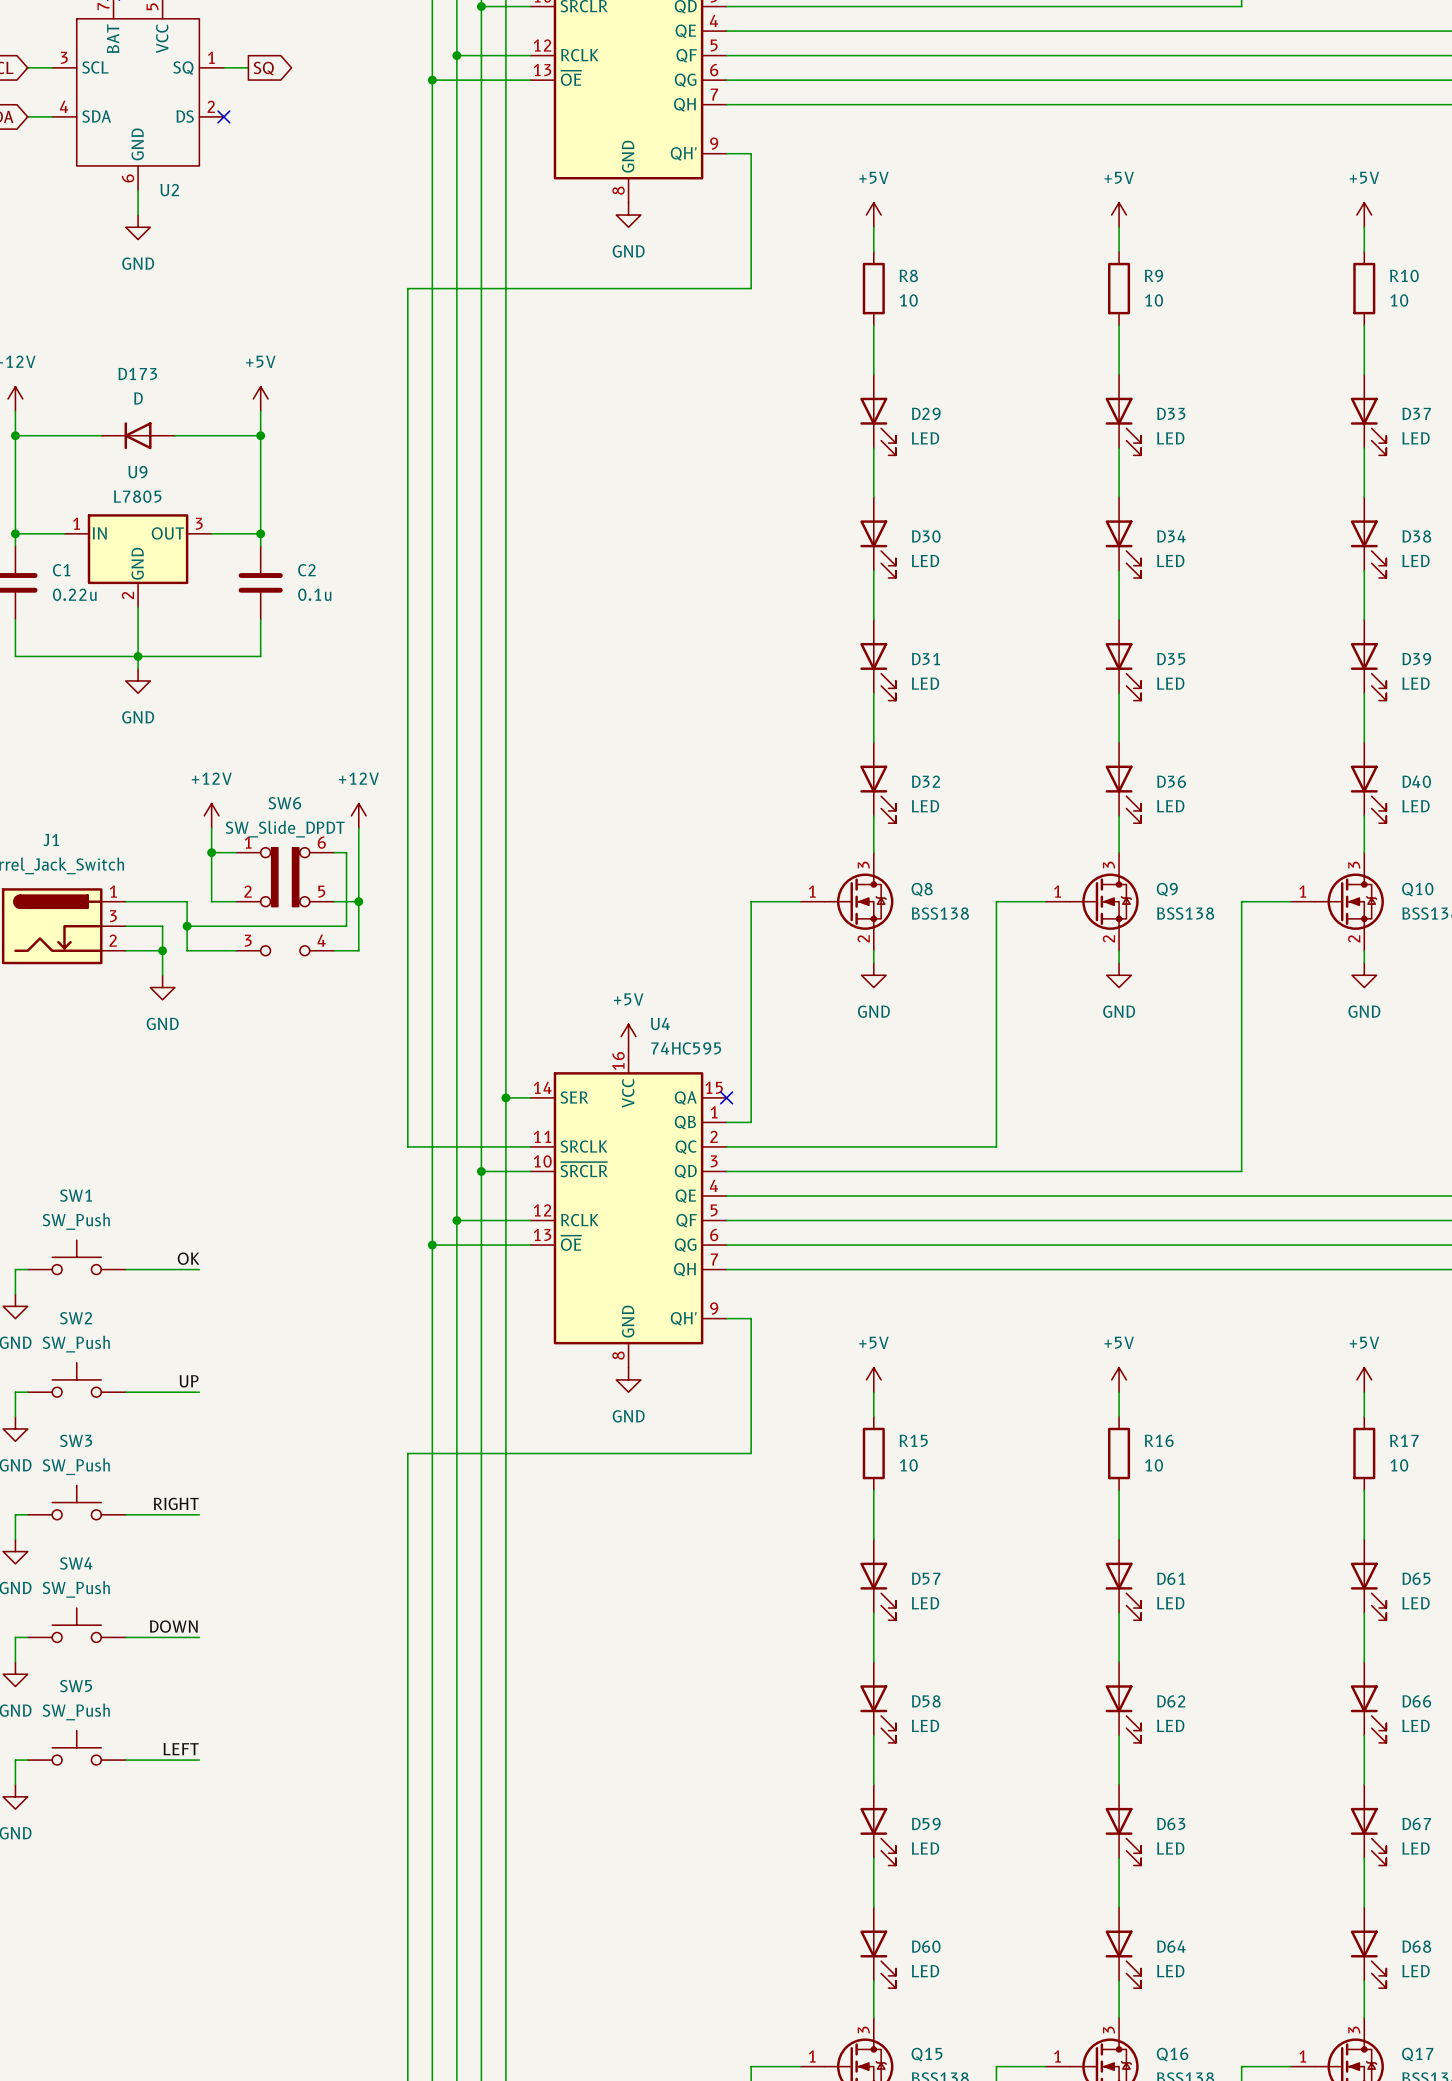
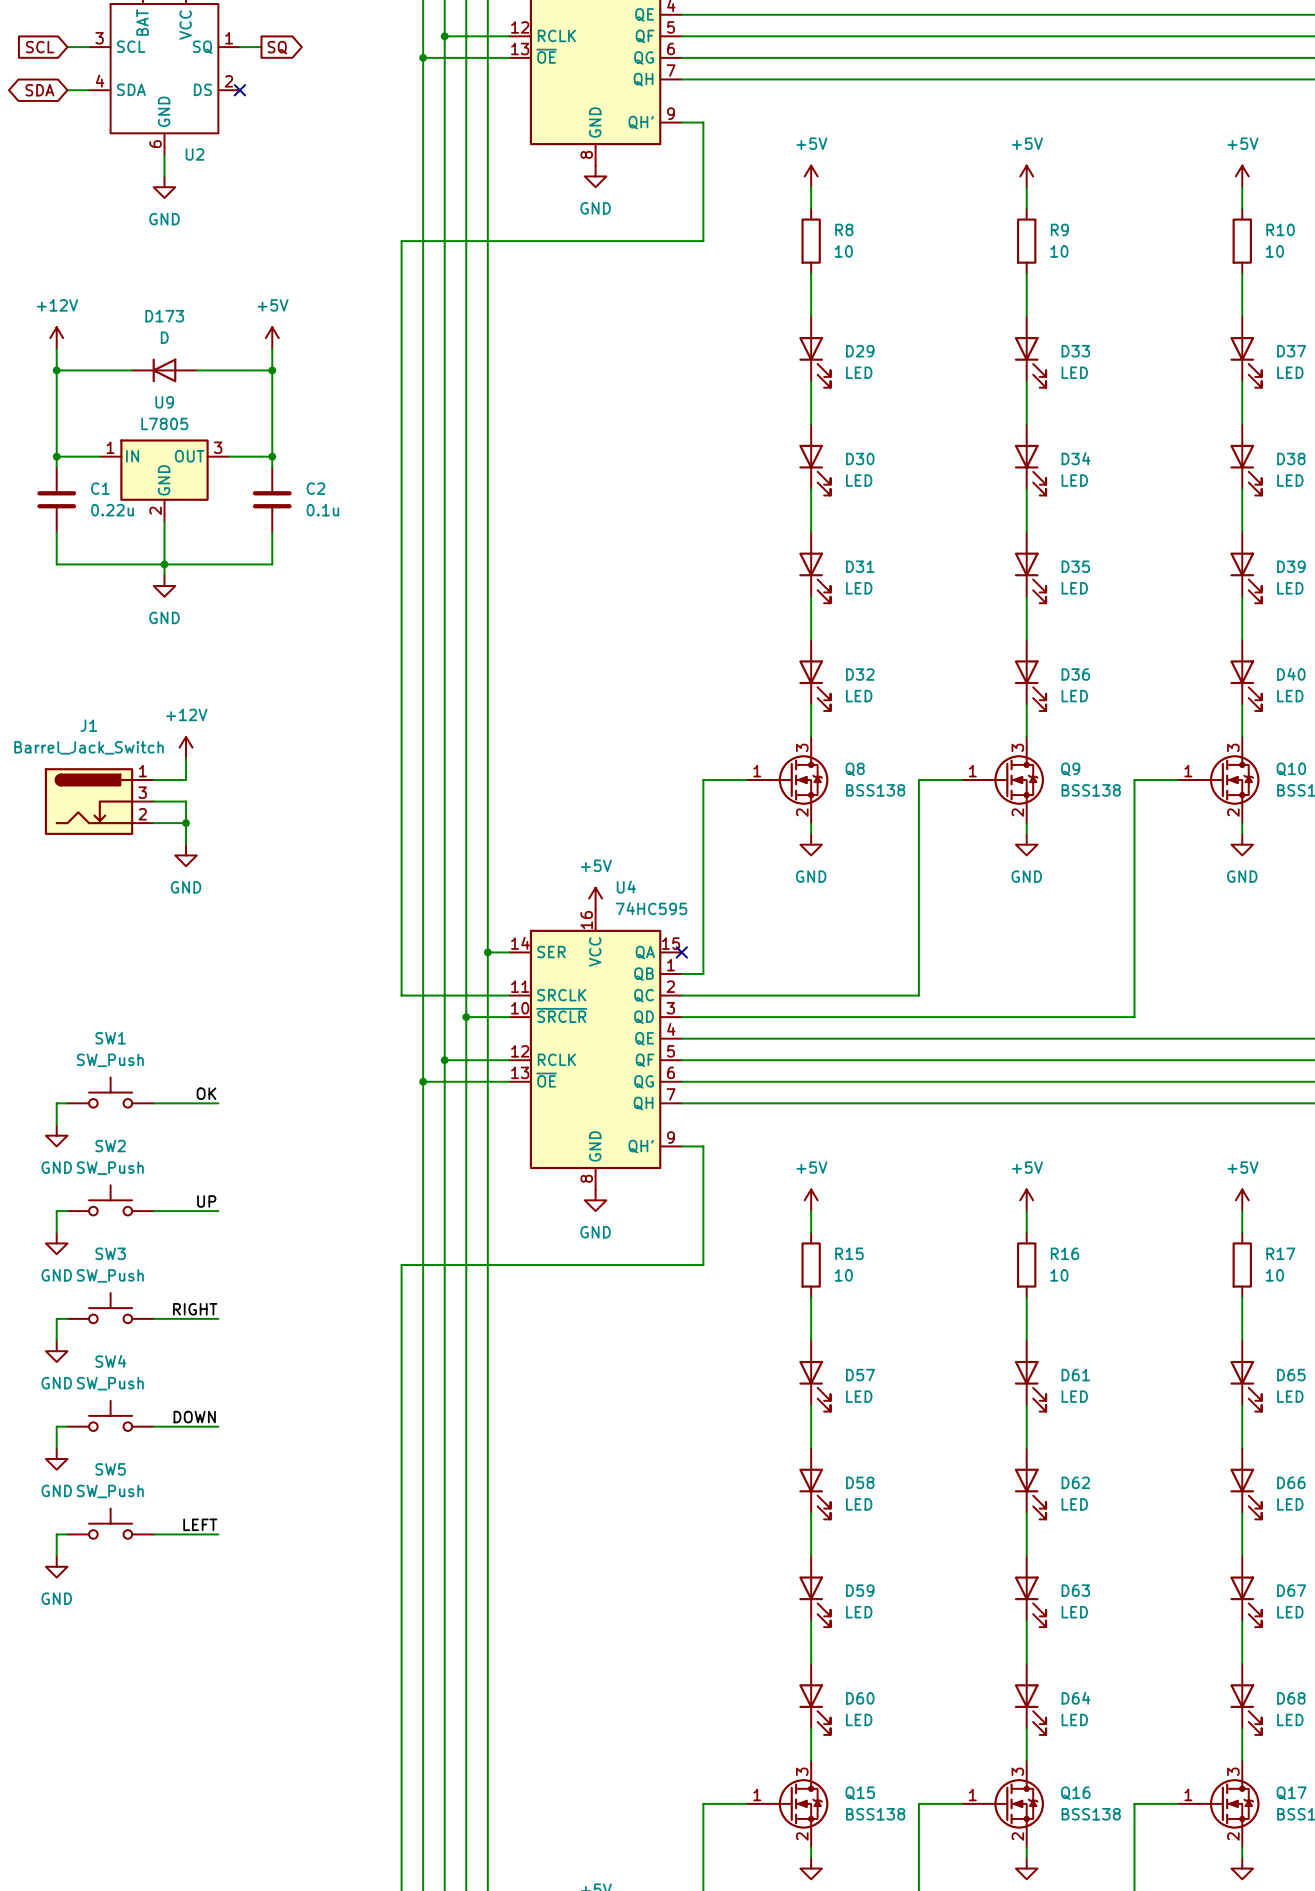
power symbol position: +12V (211, 815) -> +12V (186, 747)
power symbol: +12V (358, 815) -> none
wire: (211, 828) (211, 901) (236, 901) -> none
wire: (358, 828) (358, 950) (334, 950) -> none
wire: (211, 852) (236, 852) -> none
junction: (211, 852) -> none
wire: (334, 852) (346, 852) (346, 926) (187, 926) -> none
wire: (162, 901) (187, 901) (187, 950) (236, 950) -> (186, 780) (186, 758)
SW6: SW_Slide_DPDT (285, 901) -> none
wire: (334, 901) (358, 901) -> none
junction: (358, 901) -> none
junction: (187, 926) -> none

